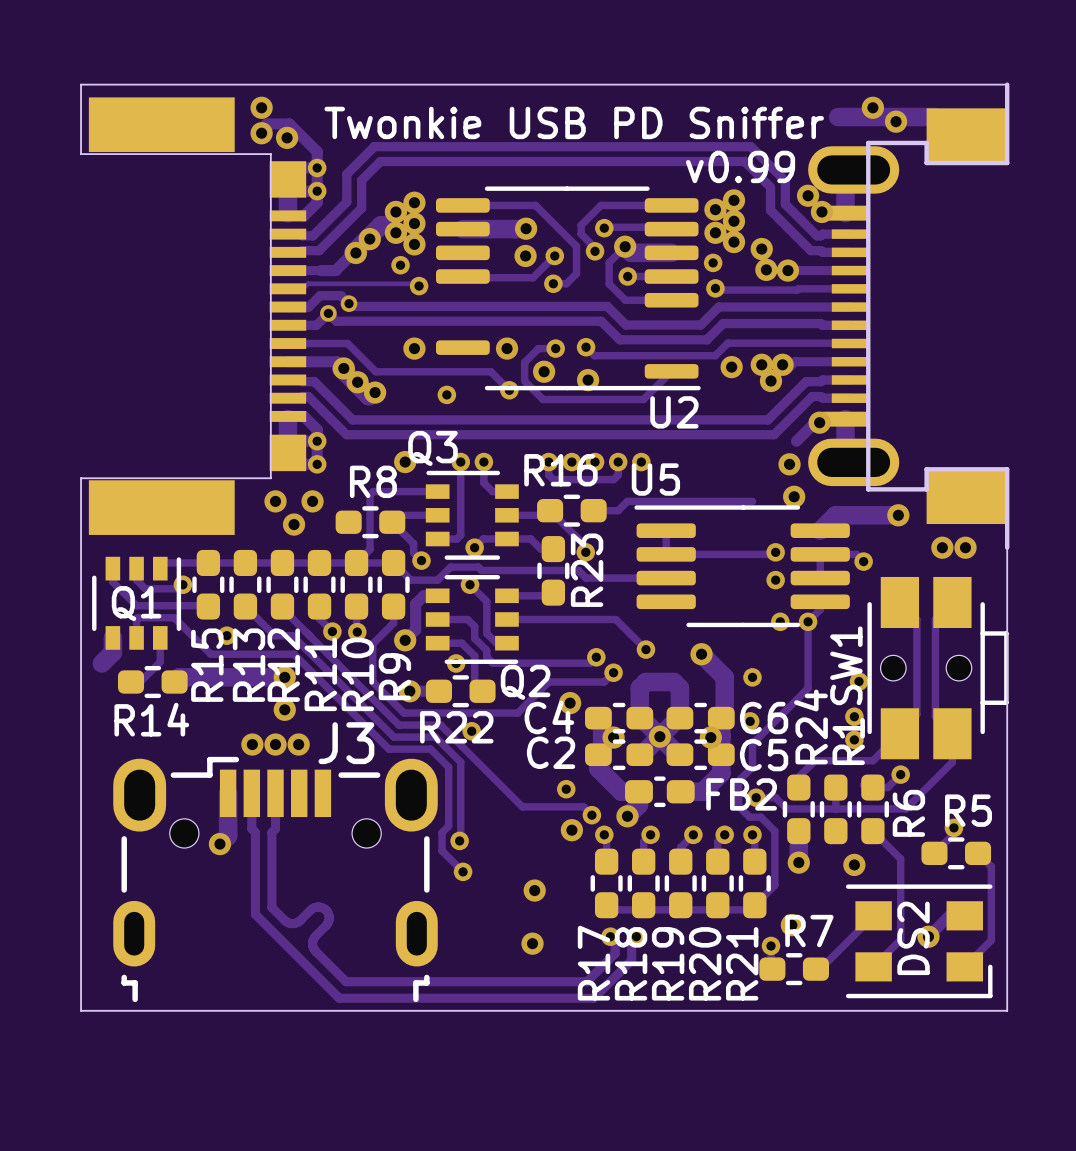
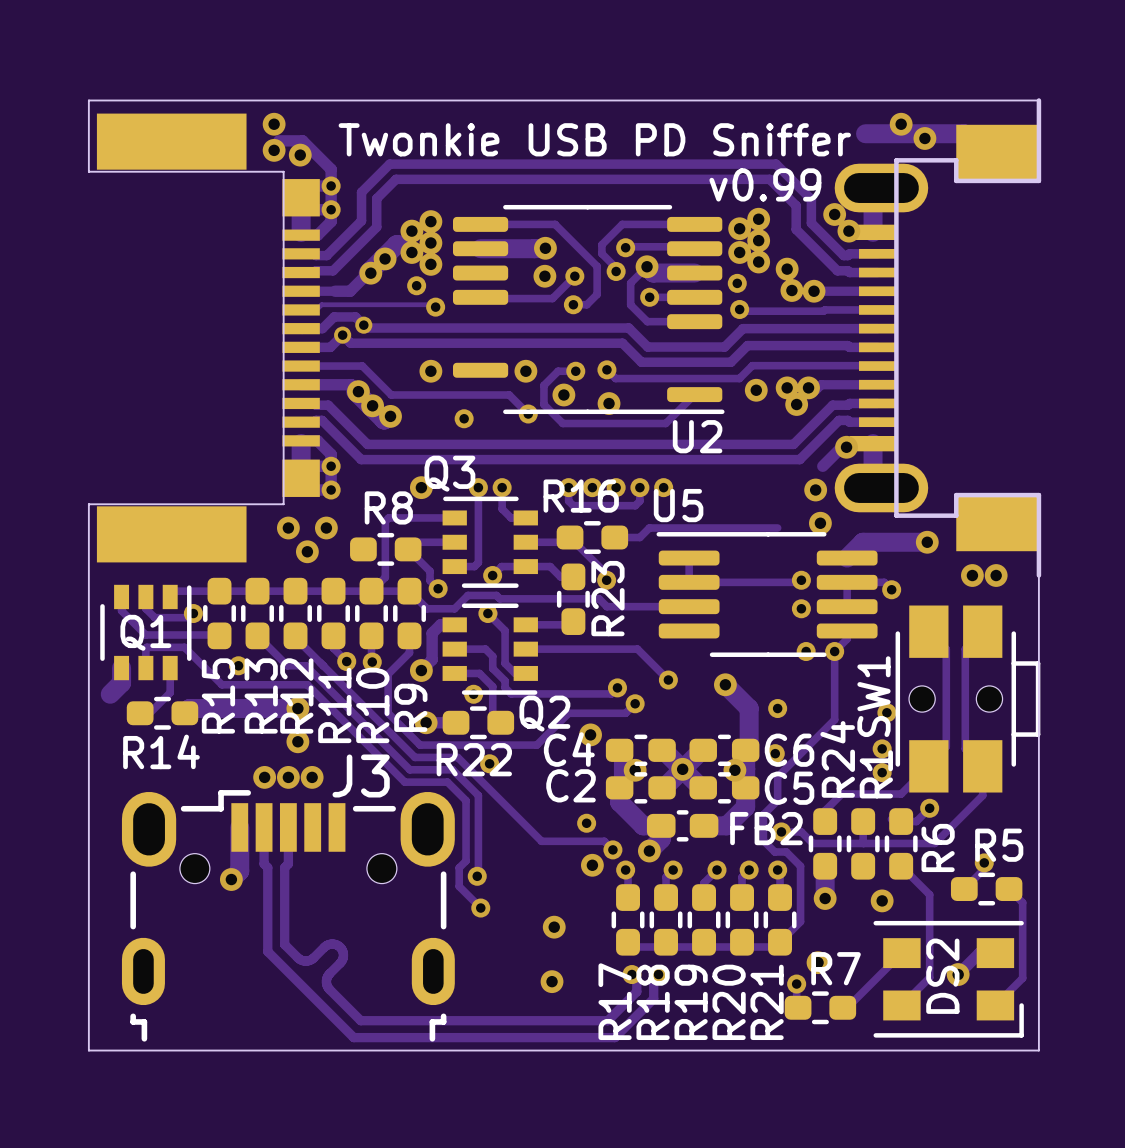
track: (639, 718) (639, 688) (645, 682) (673, 682) (679, 688) (679, 718) -> none

